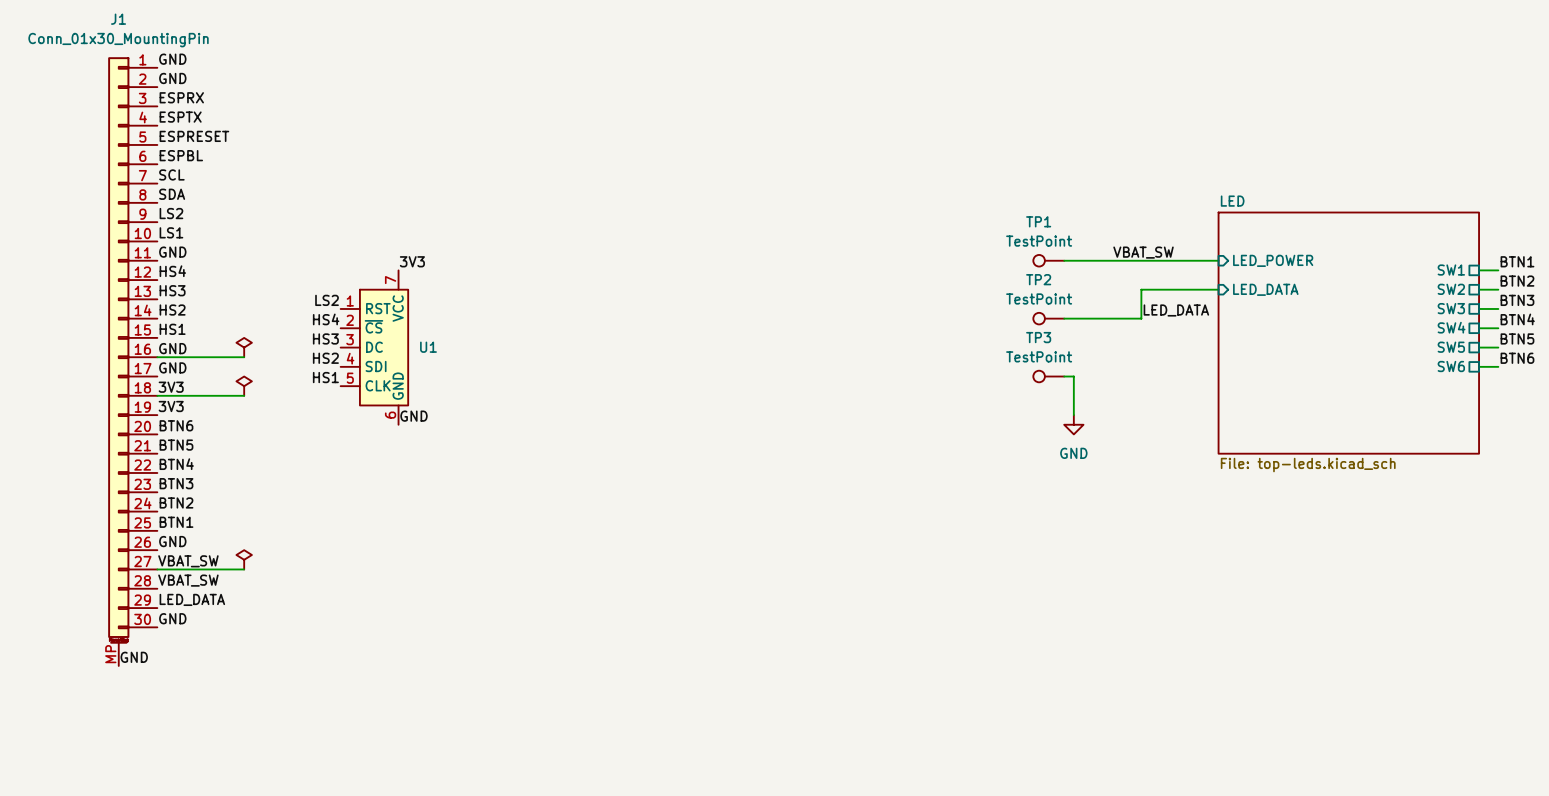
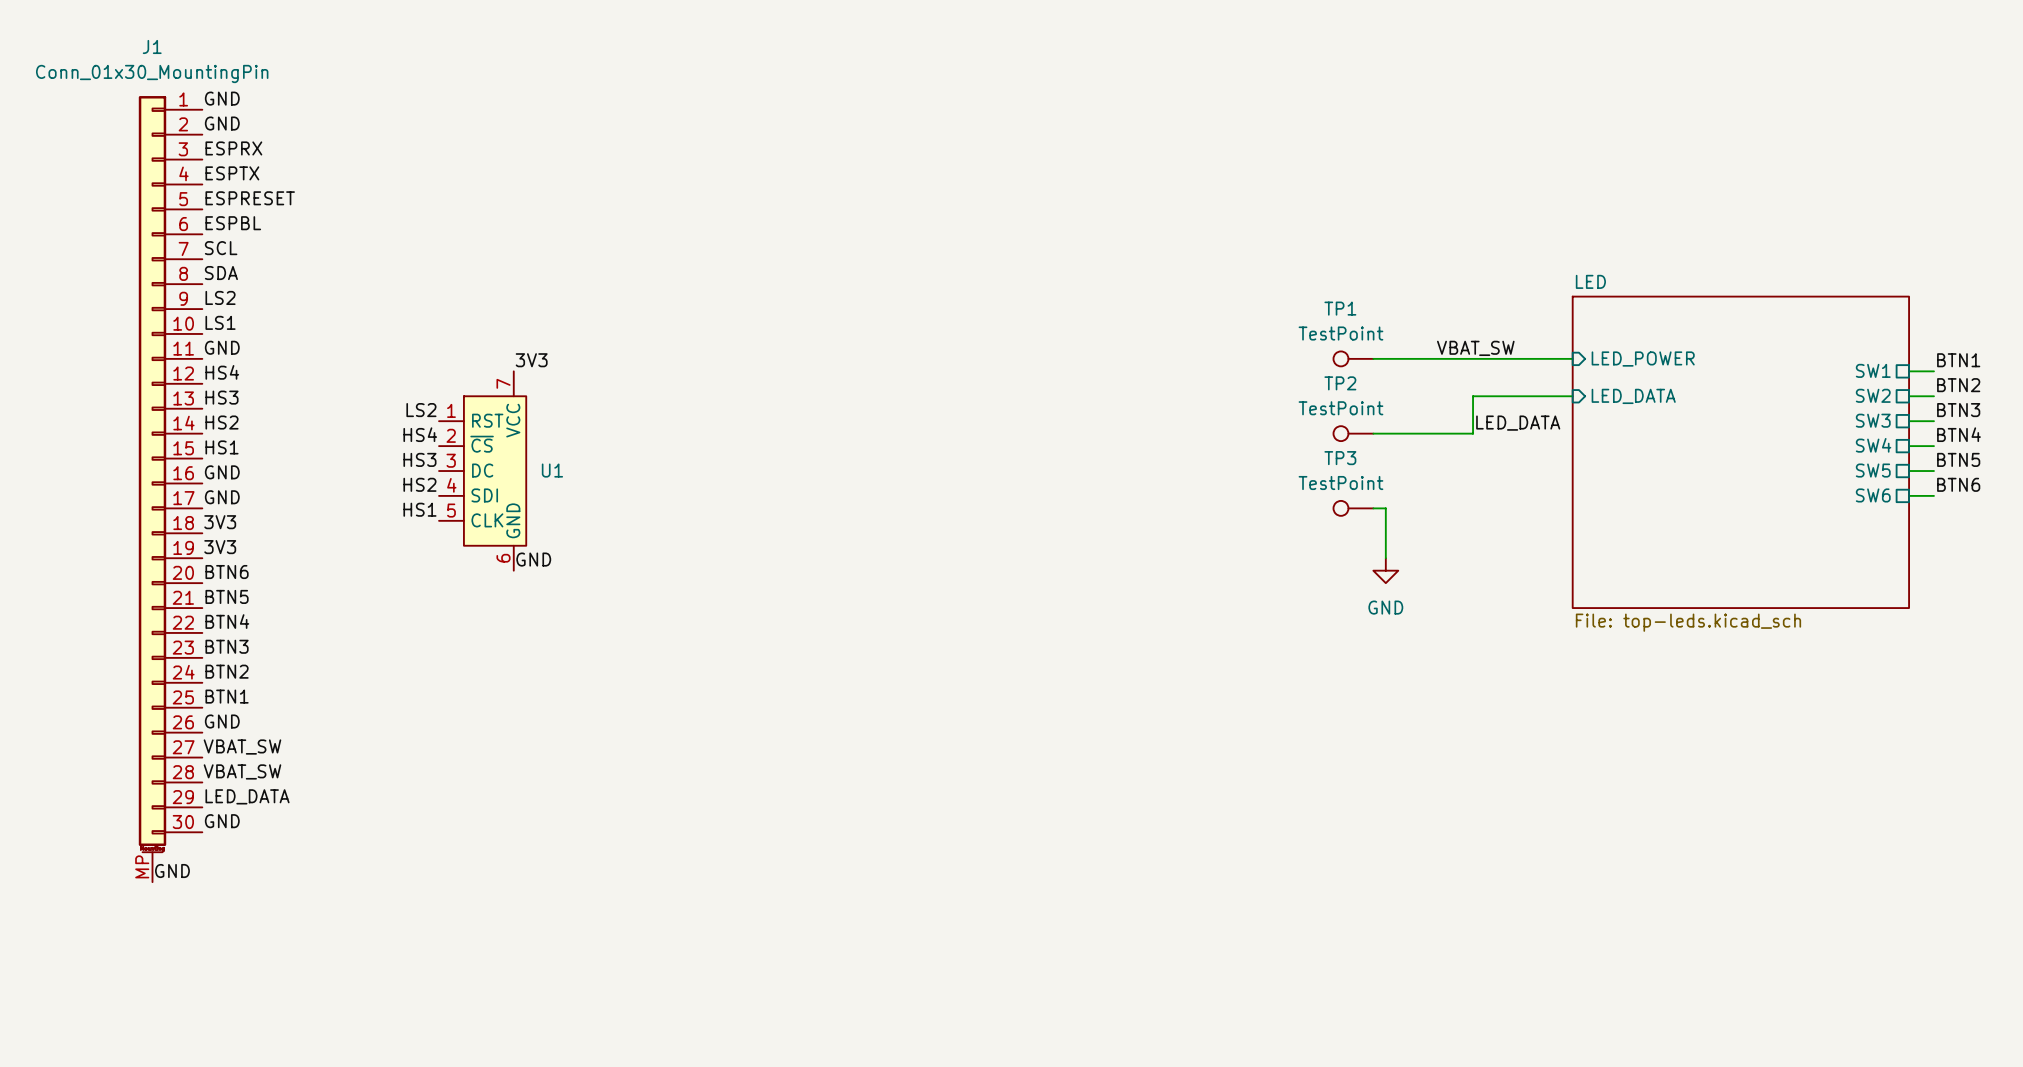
power symbol: (244, 347) -> none
wire: (157, 357) (244, 357) -> none
power symbol: (244, 386) -> none
wire: (157, 395) (244, 395) -> none
power symbol: (244, 559) -> none
wire: (157, 569) (244, 569) -> none

